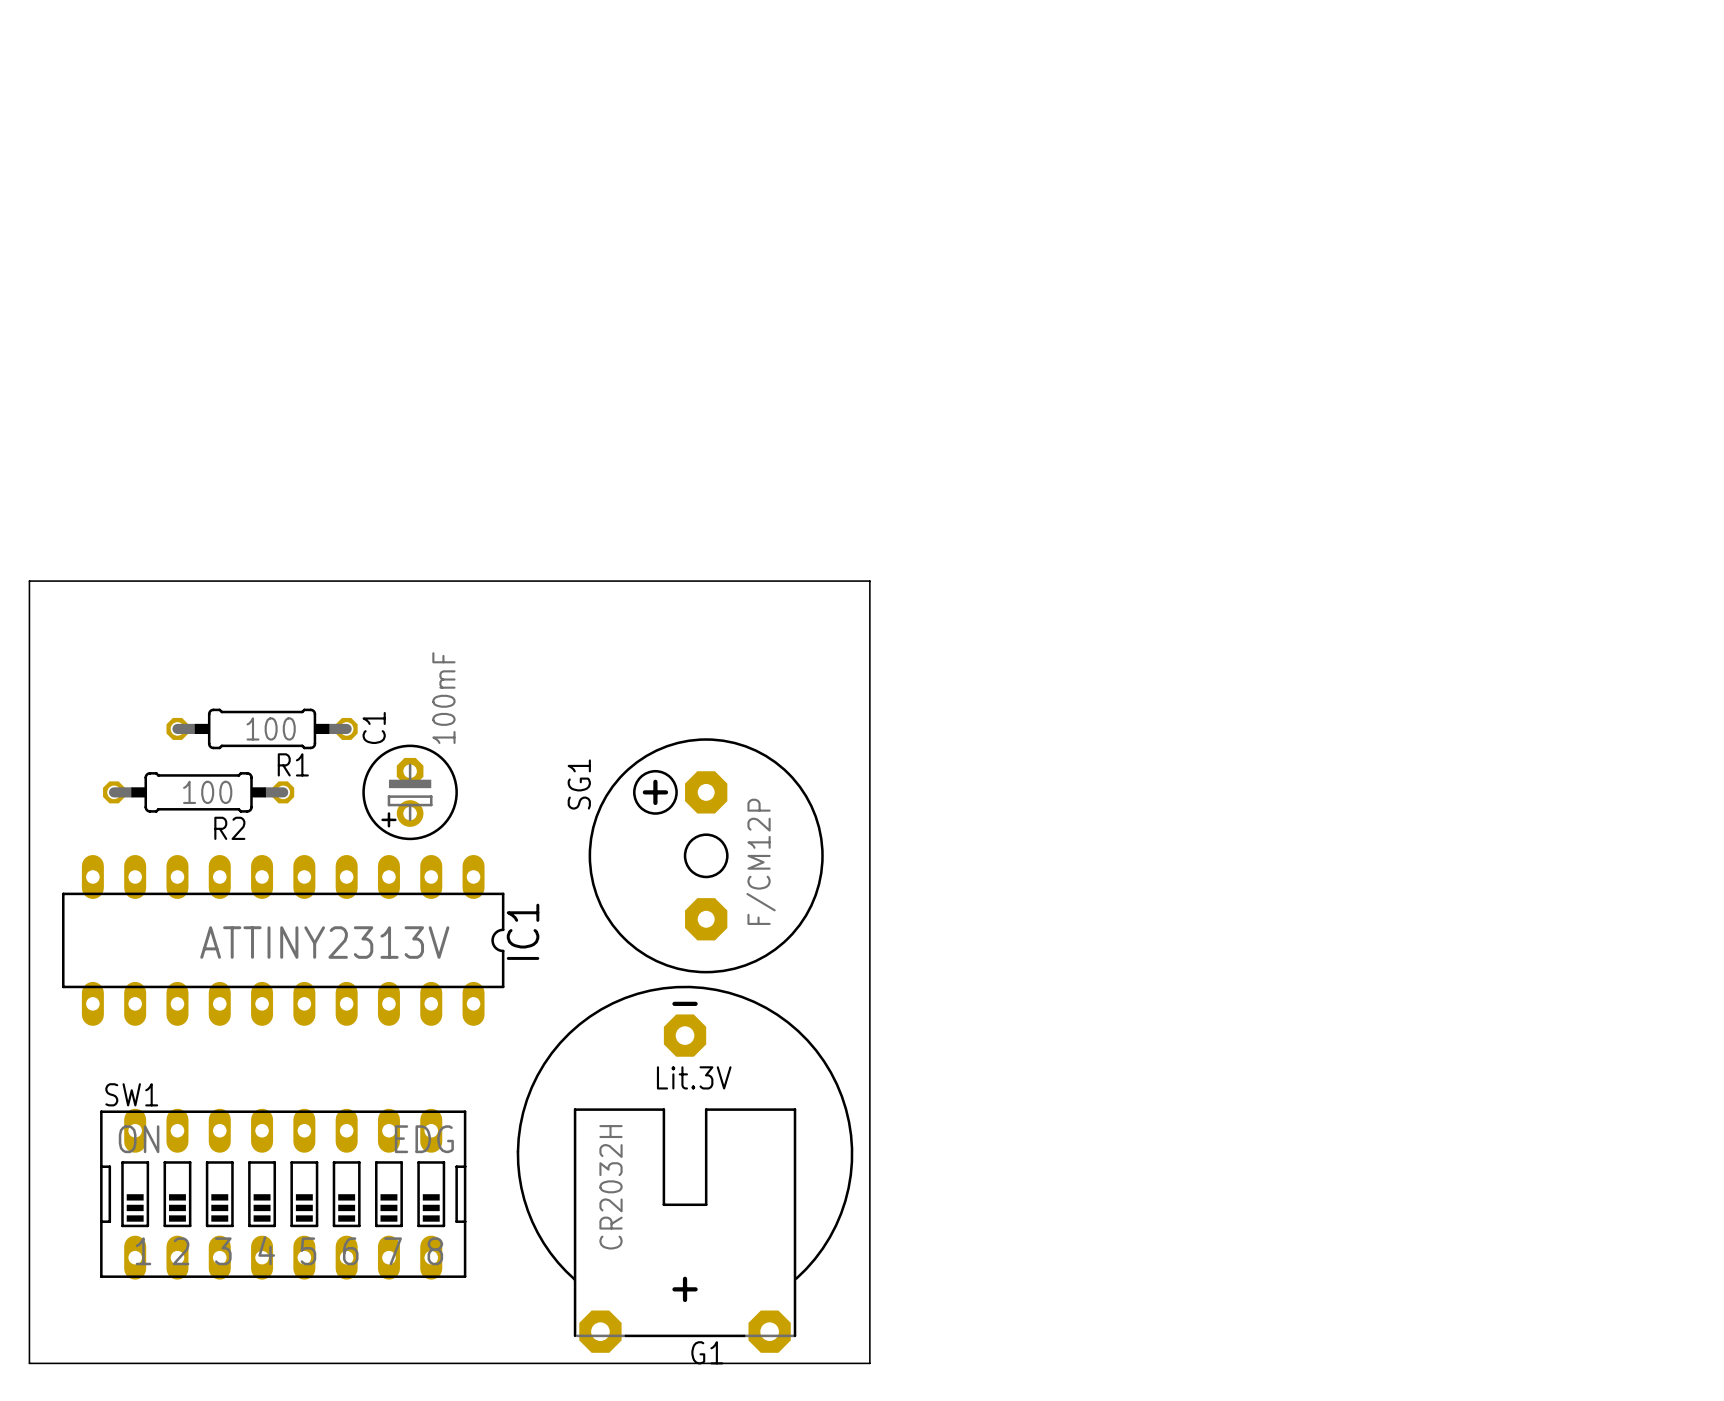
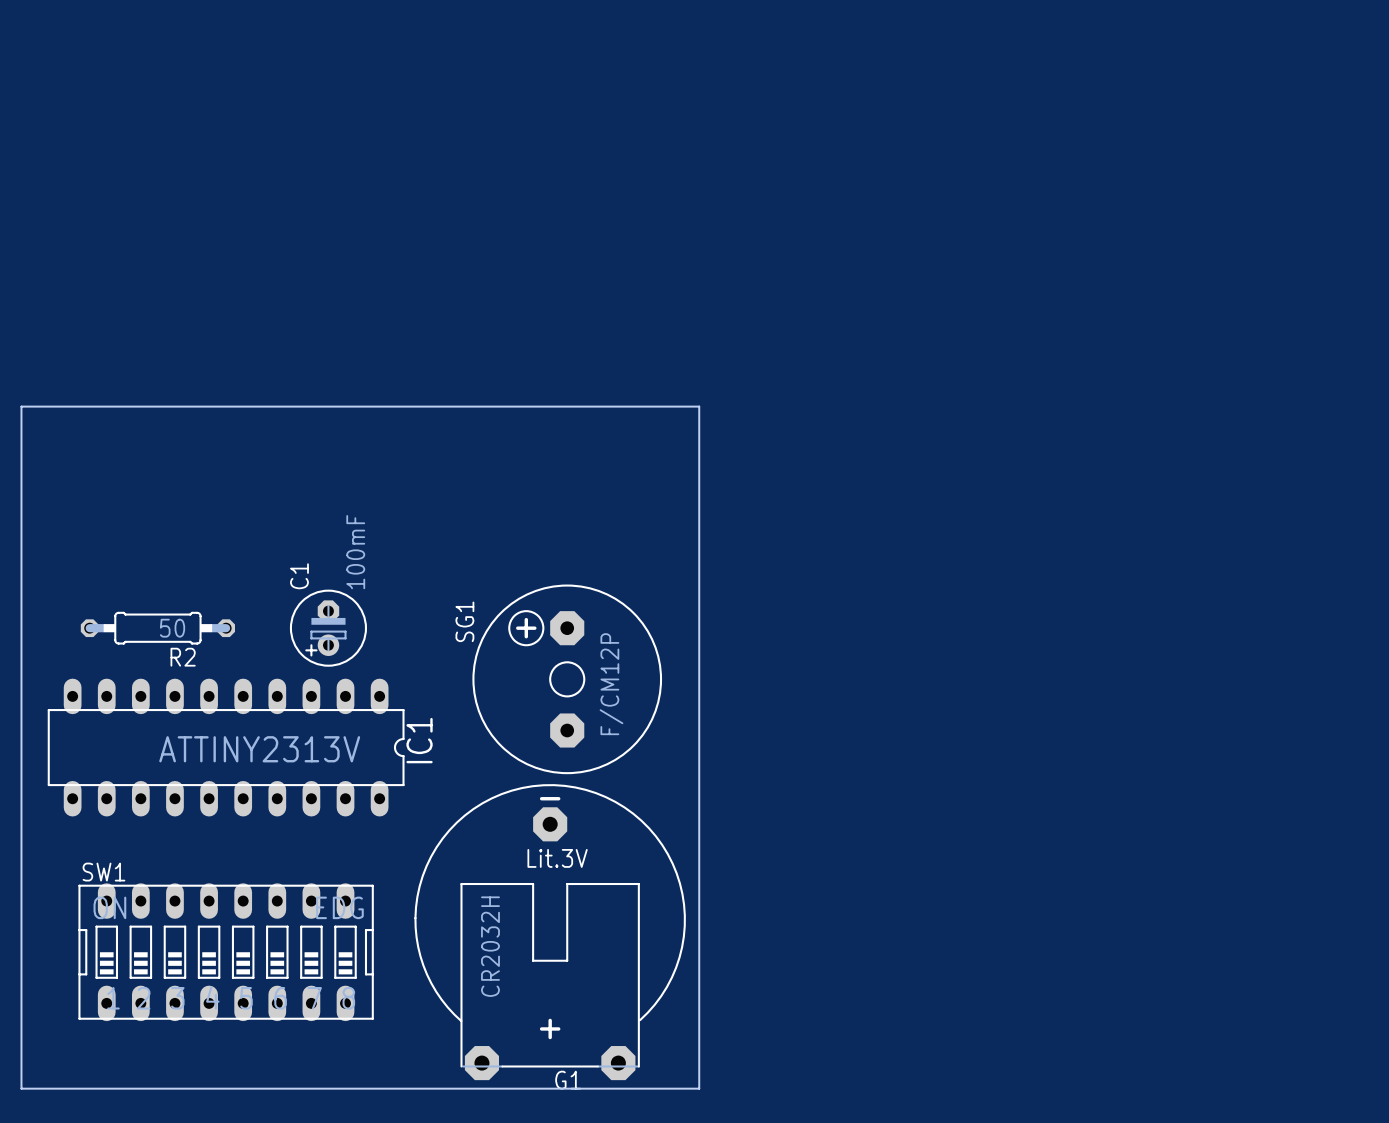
board edge: (29, 581) (869, 581) -> (21, 457) (21, 406) (699, 406) (699, 457)
R1: 100 (262, 728) -> none
R2 value: 100 (207, 792) -> 50 (172, 628)

